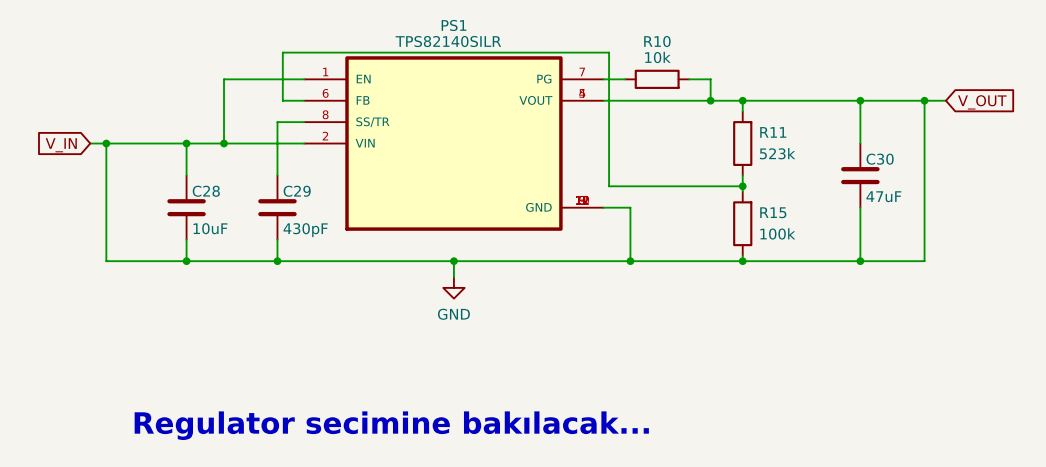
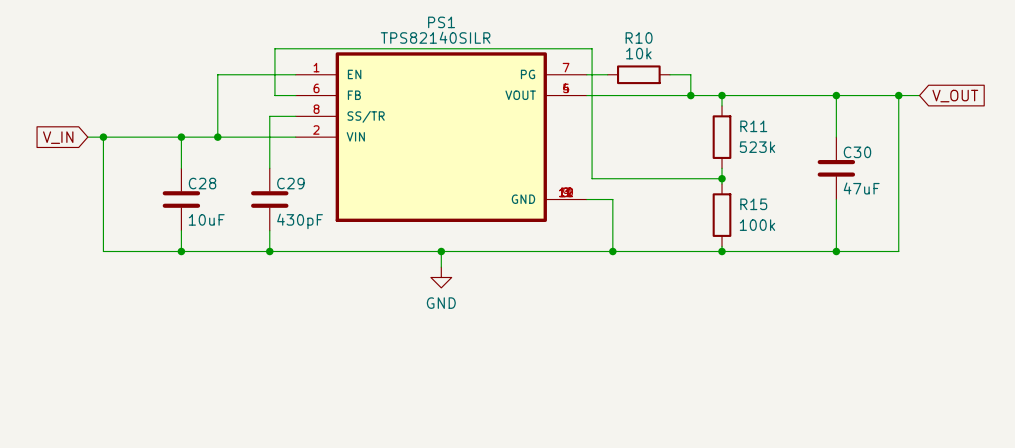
text: Regulator secimine bakılacak... (391, 425) -> none

